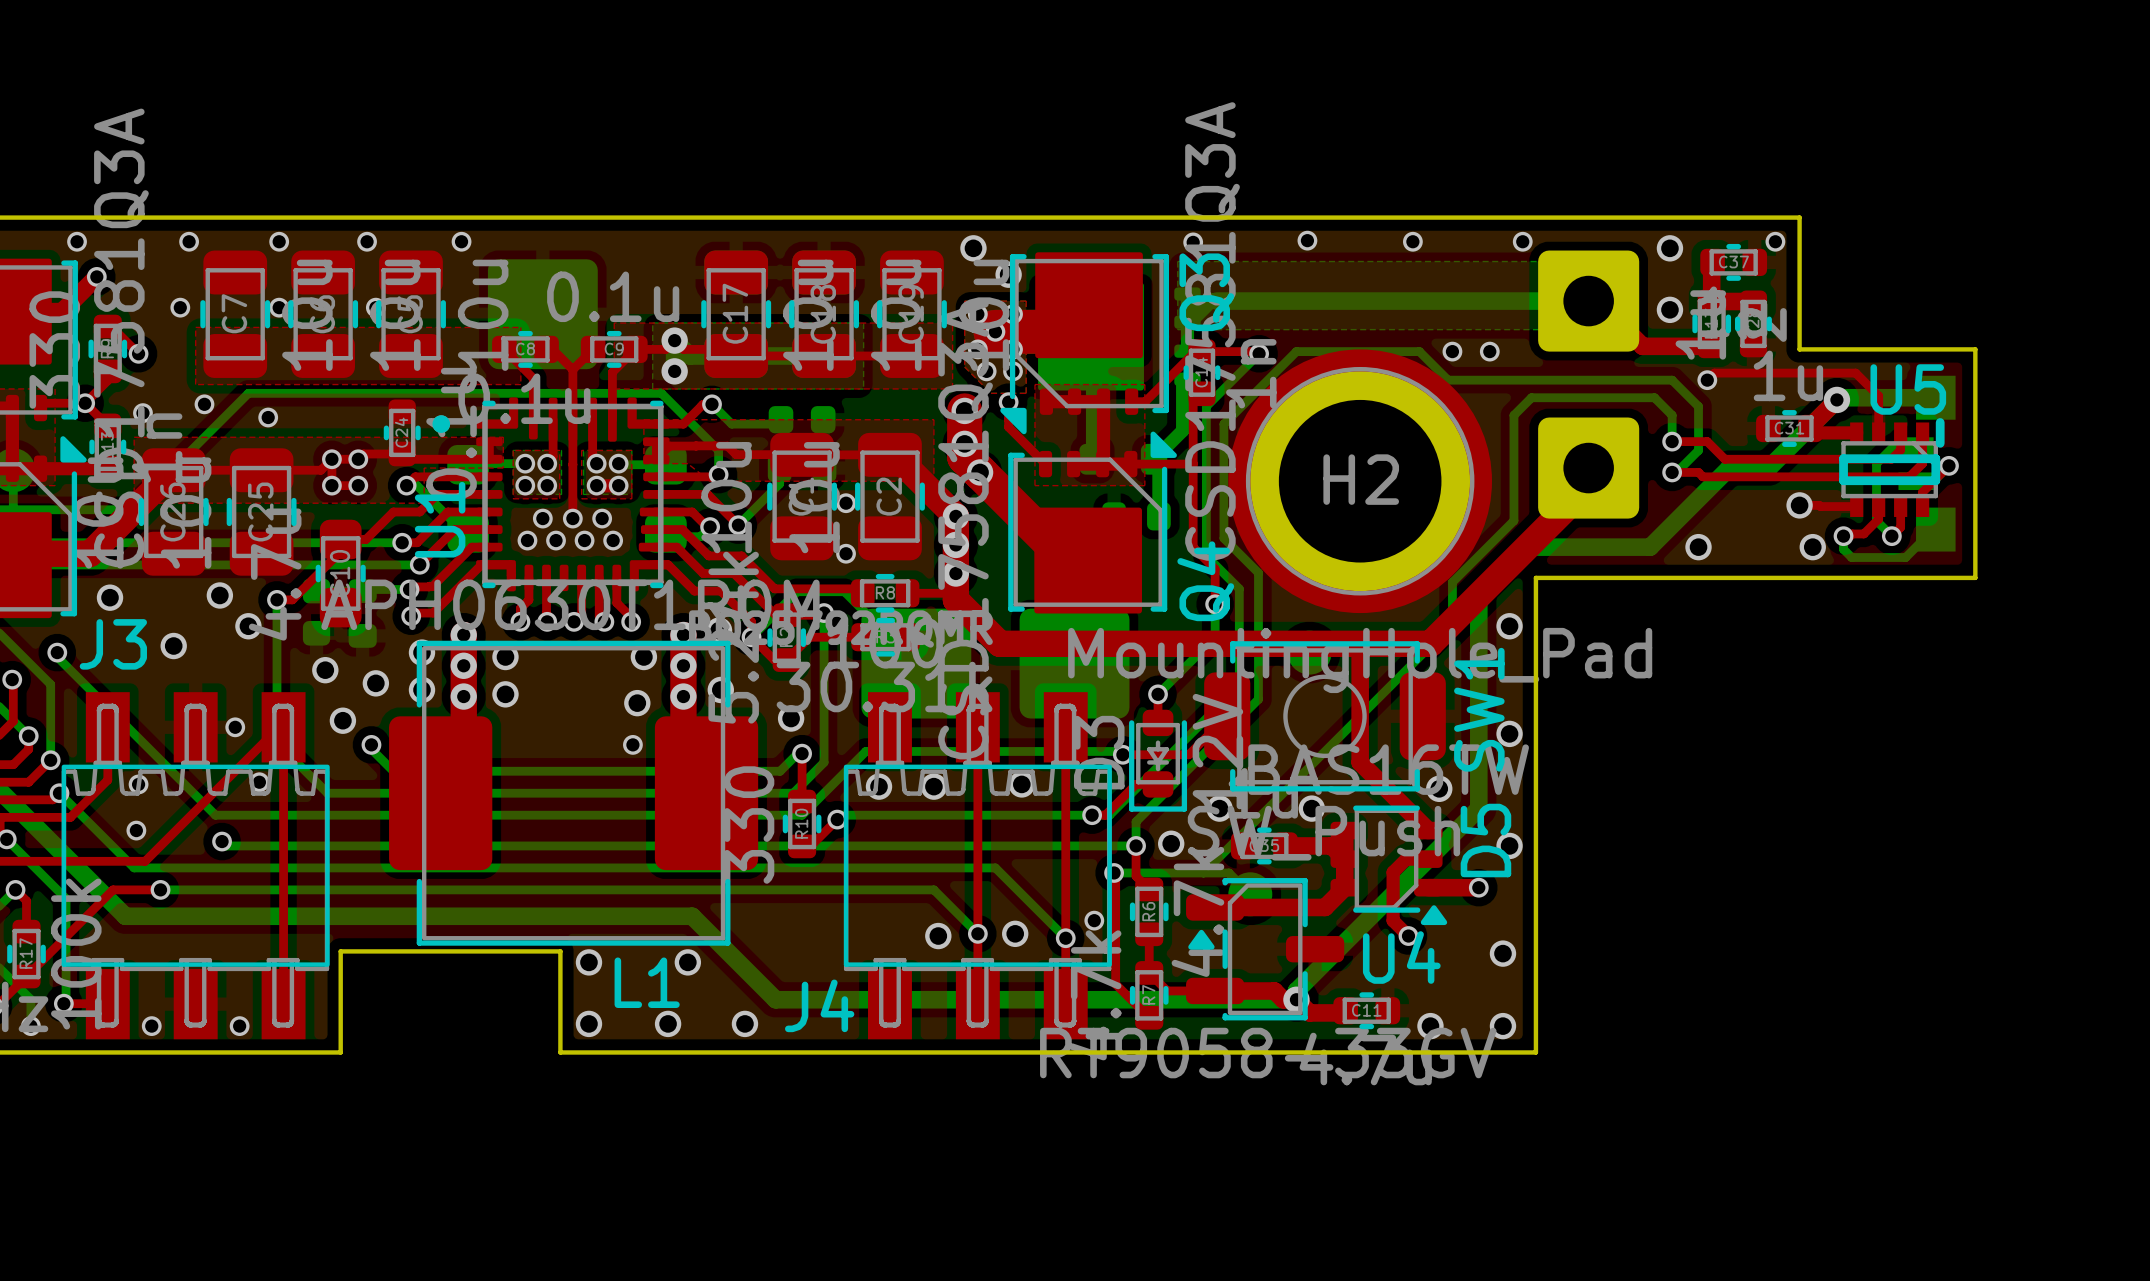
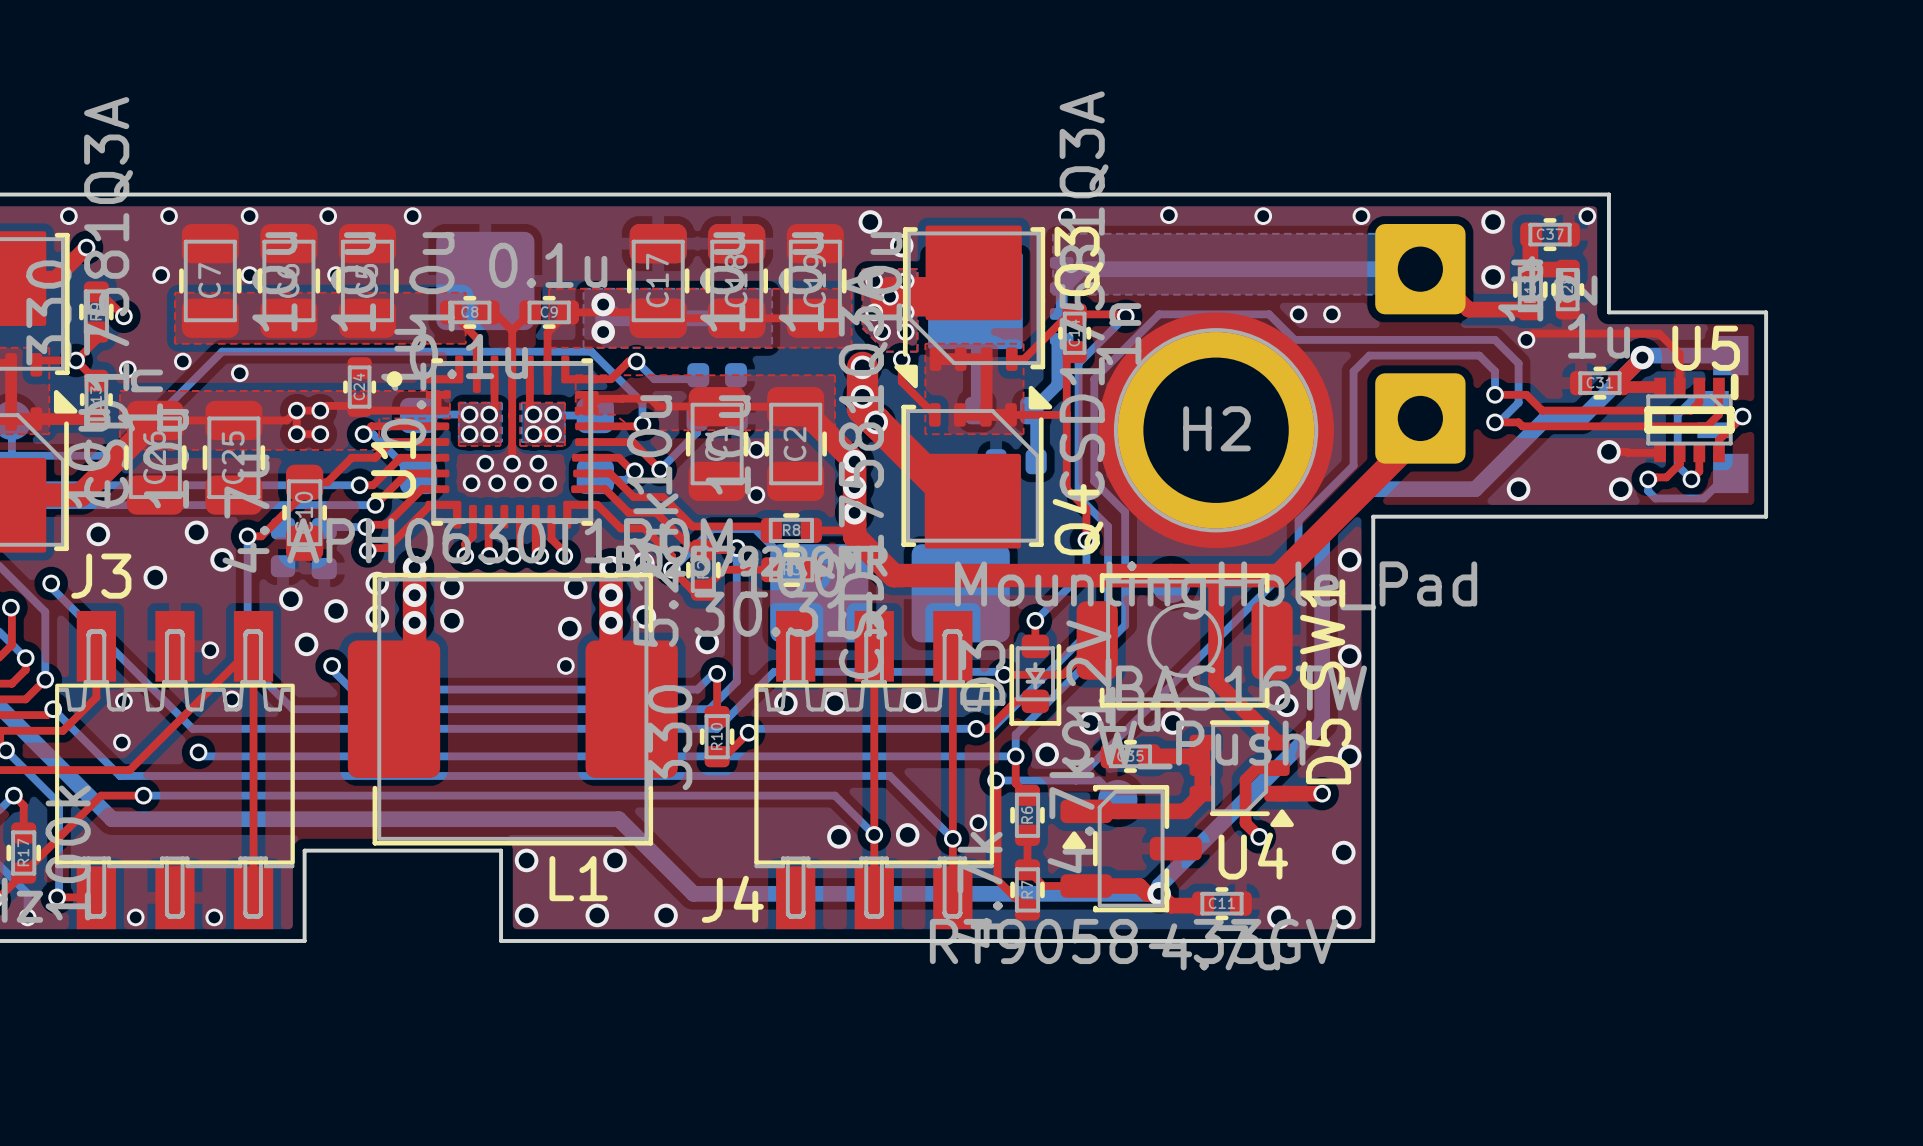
J3 footprint: [61, 692, 330, 1040] -> [55, 610, 295, 930]
J4 footprint: [843, 692, 1112, 1040] -> [754, 610, 995, 930]

